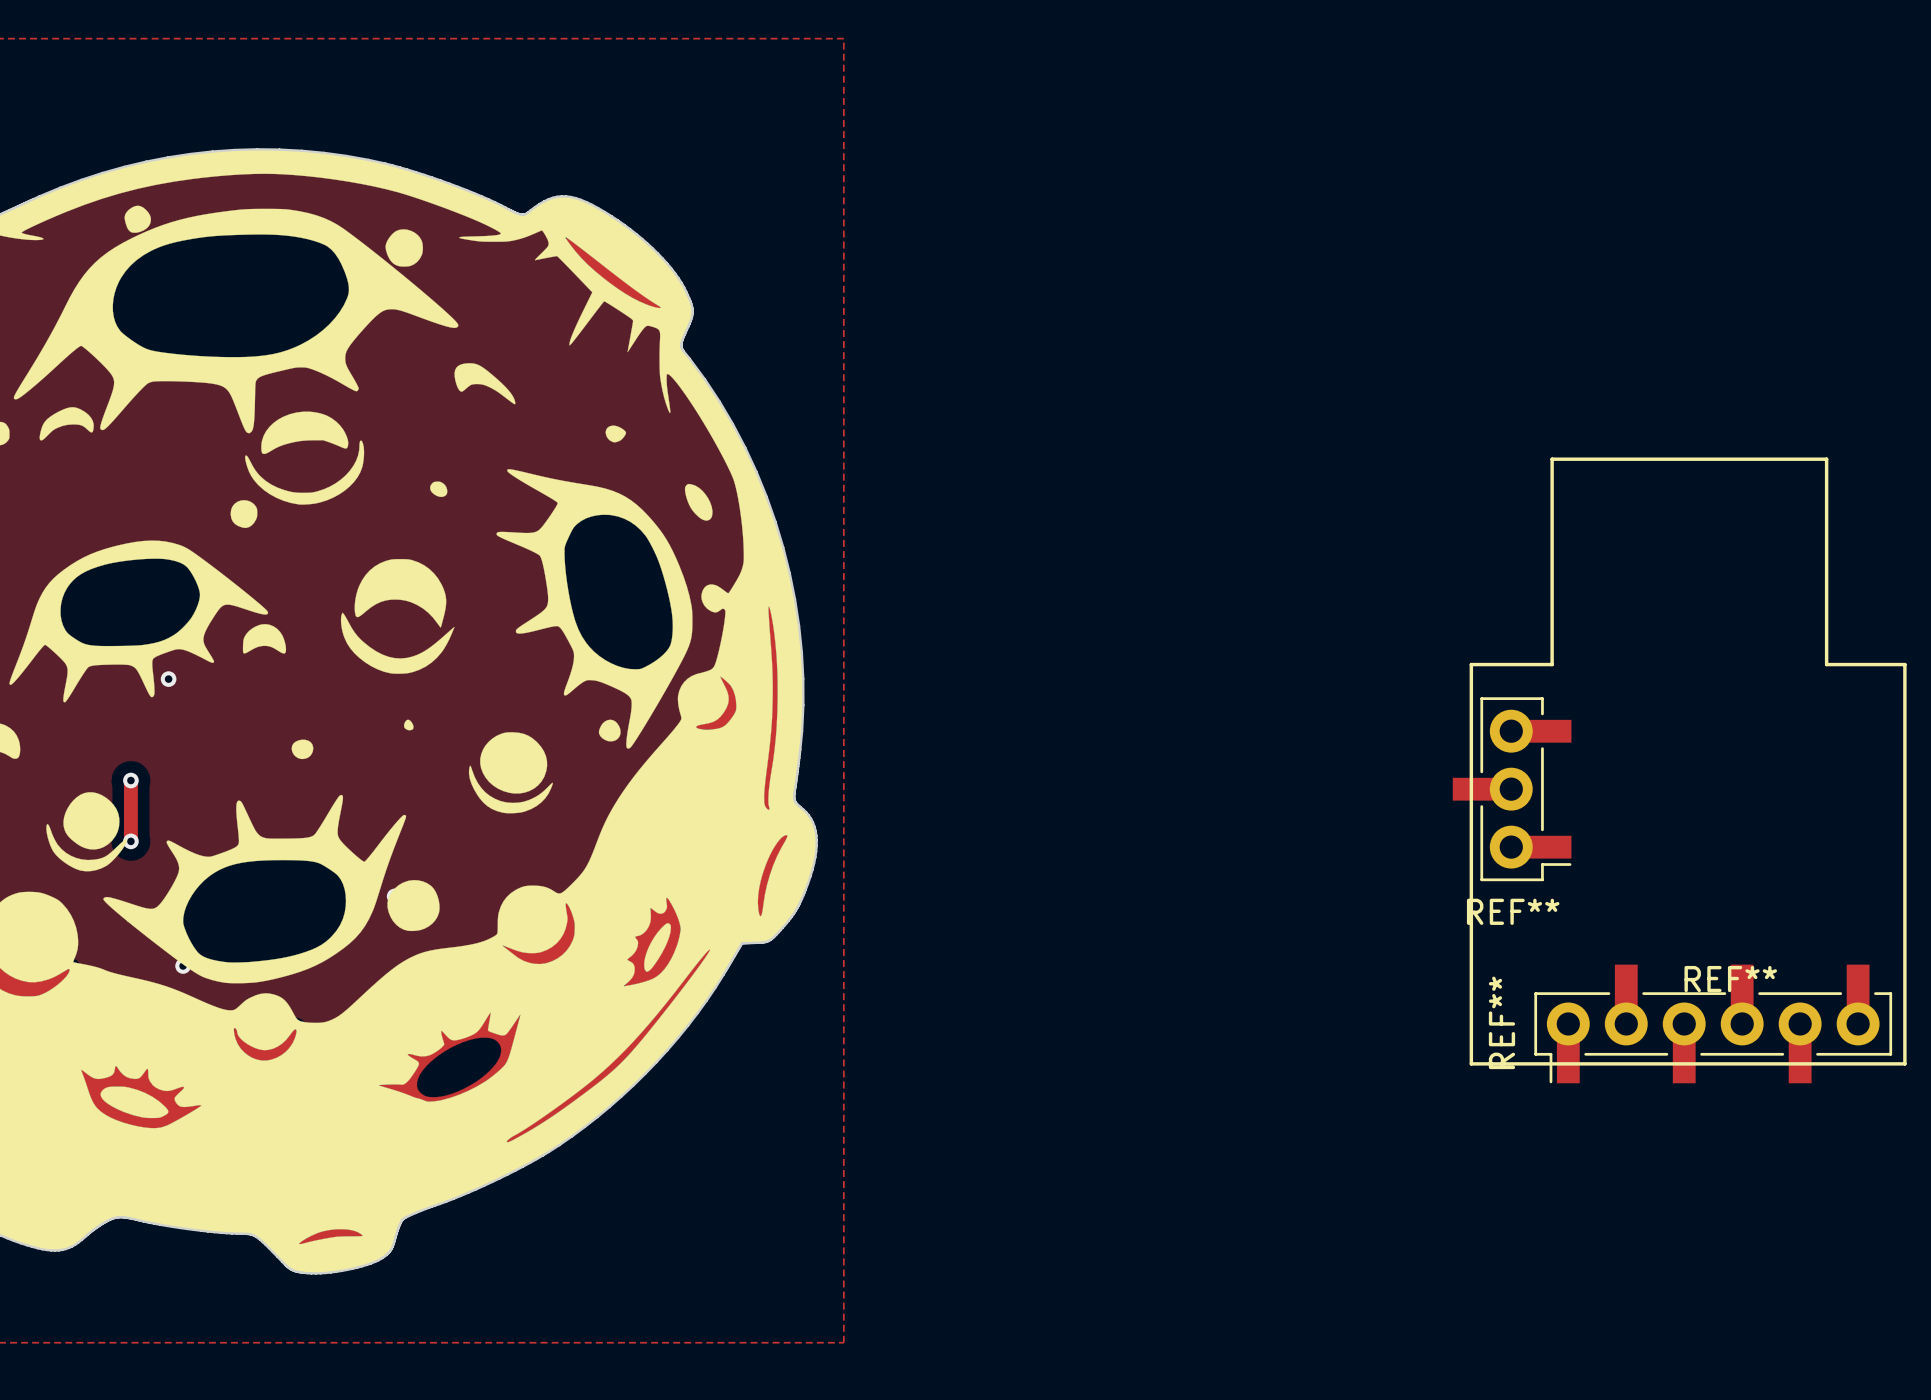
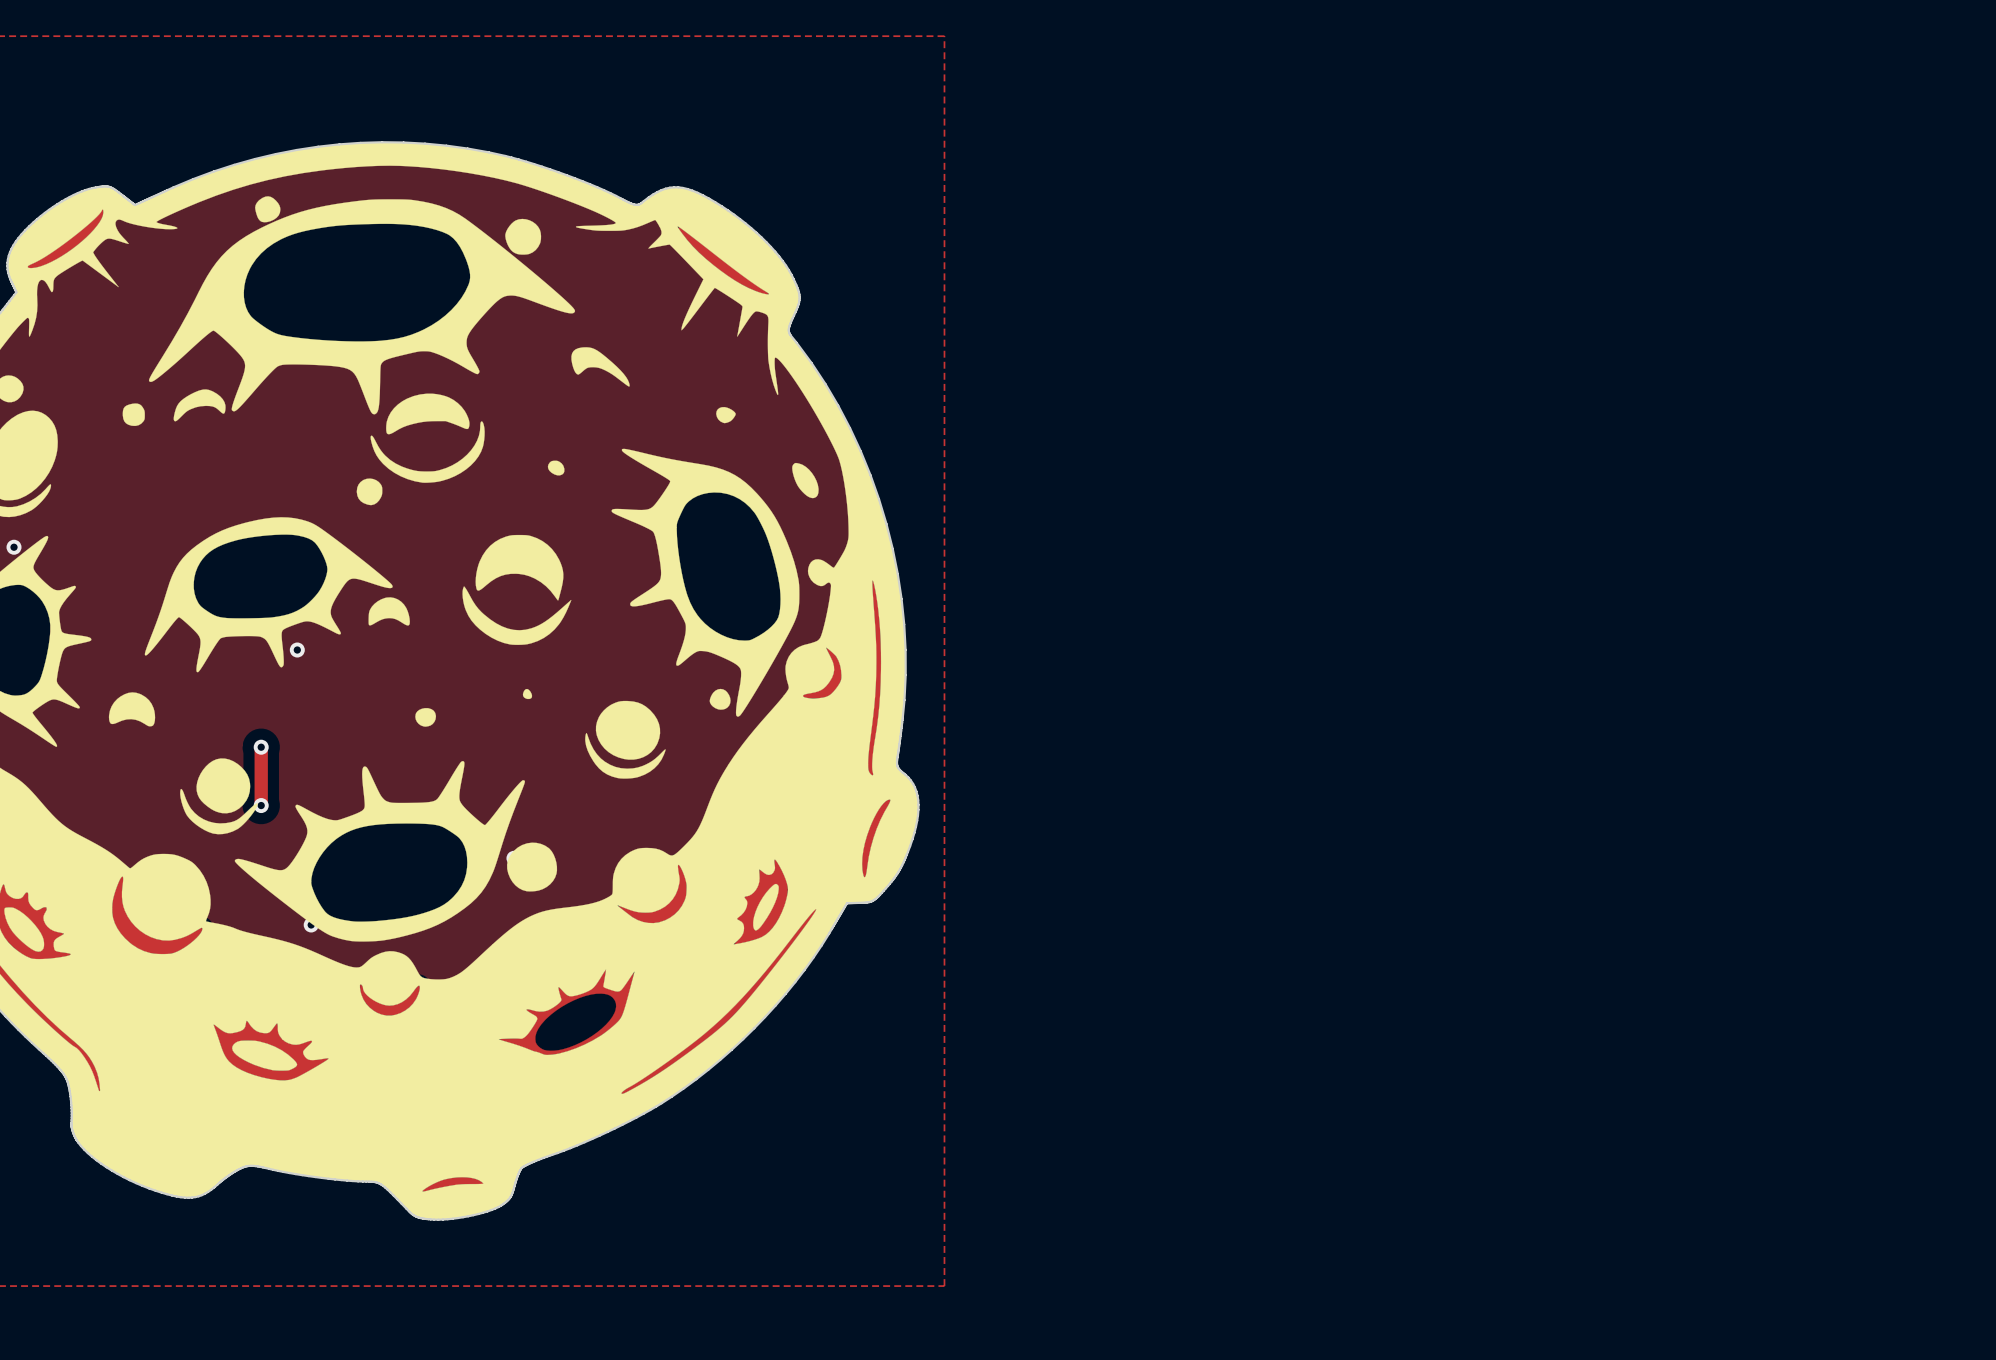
REF**: (1688, 761) -> none
REF**: (1512, 789) -> none
REF**: (1713, 1023) -> none

